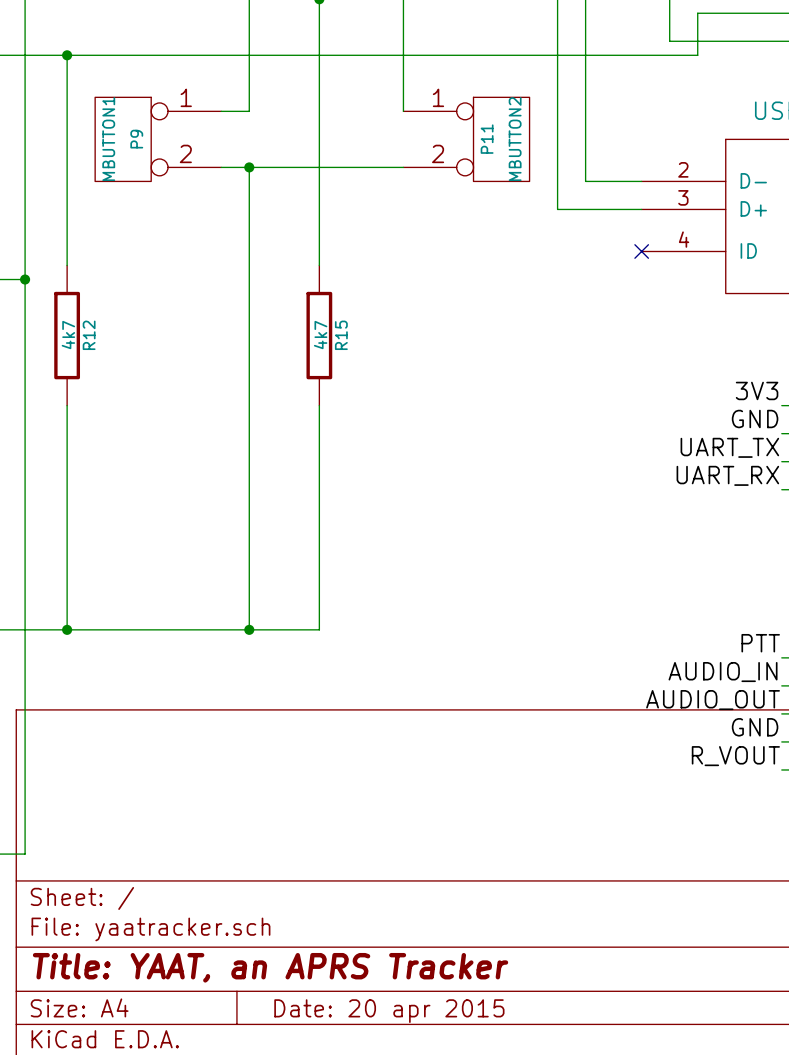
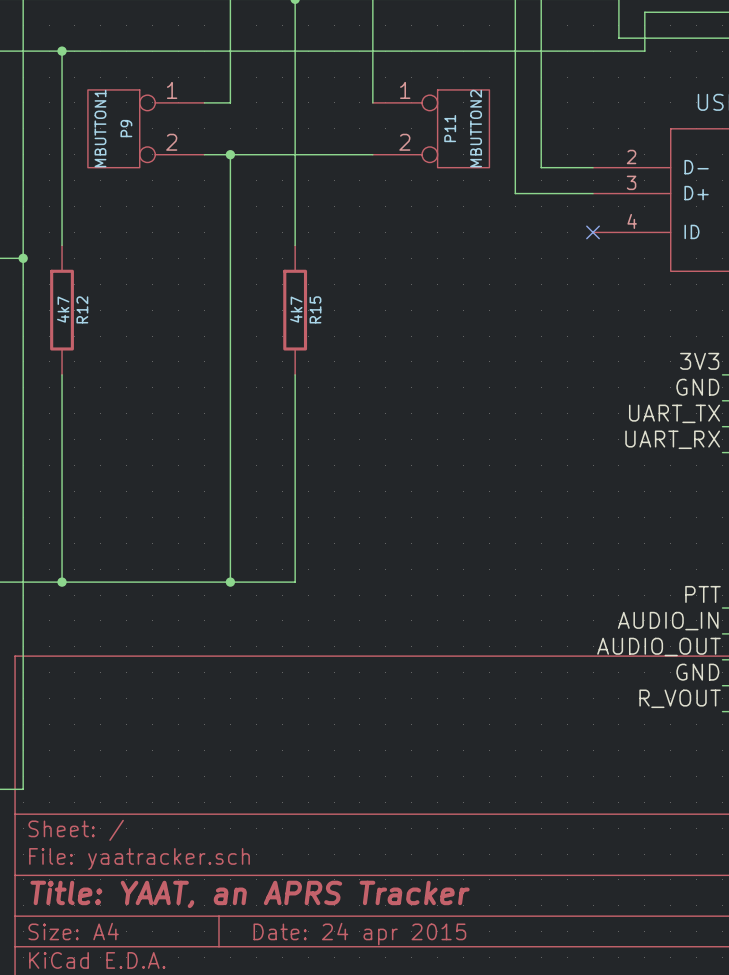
title block: Date: 20 apr 2015 (389, 1011) -> Date: 24 apr 2015 (359, 934)

